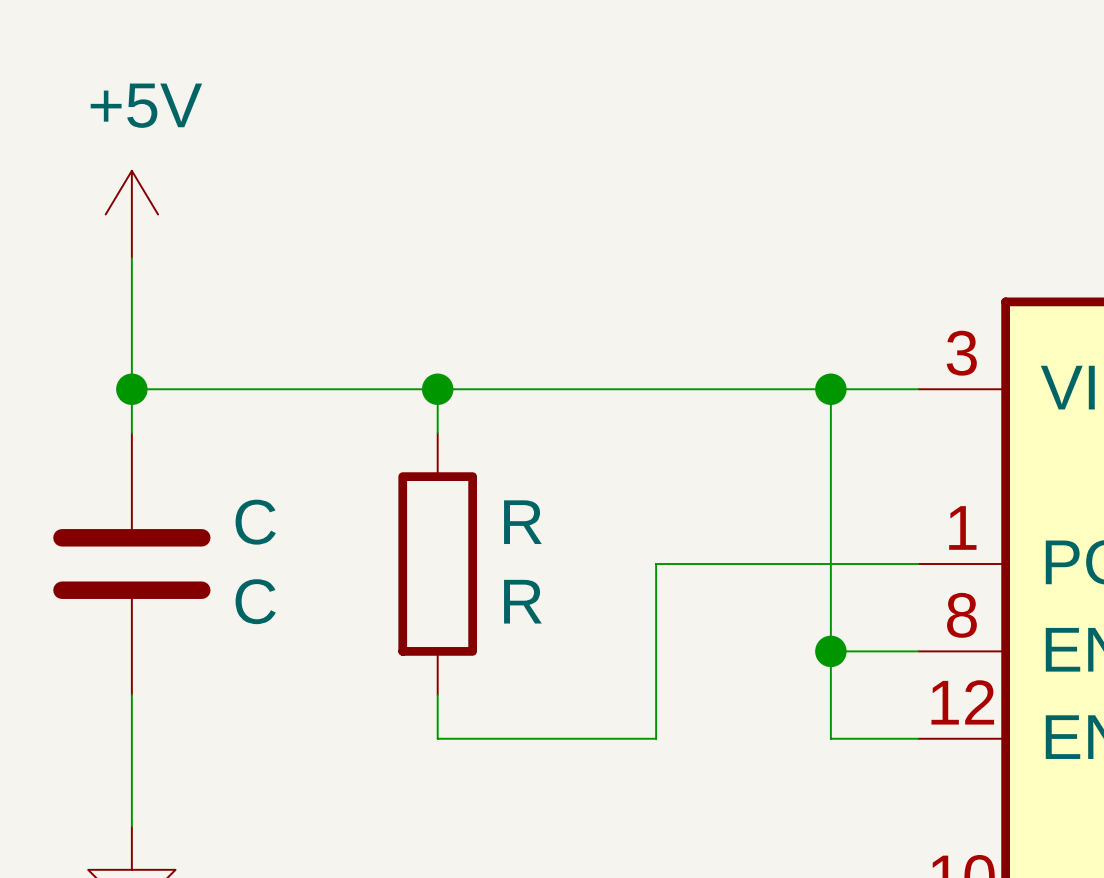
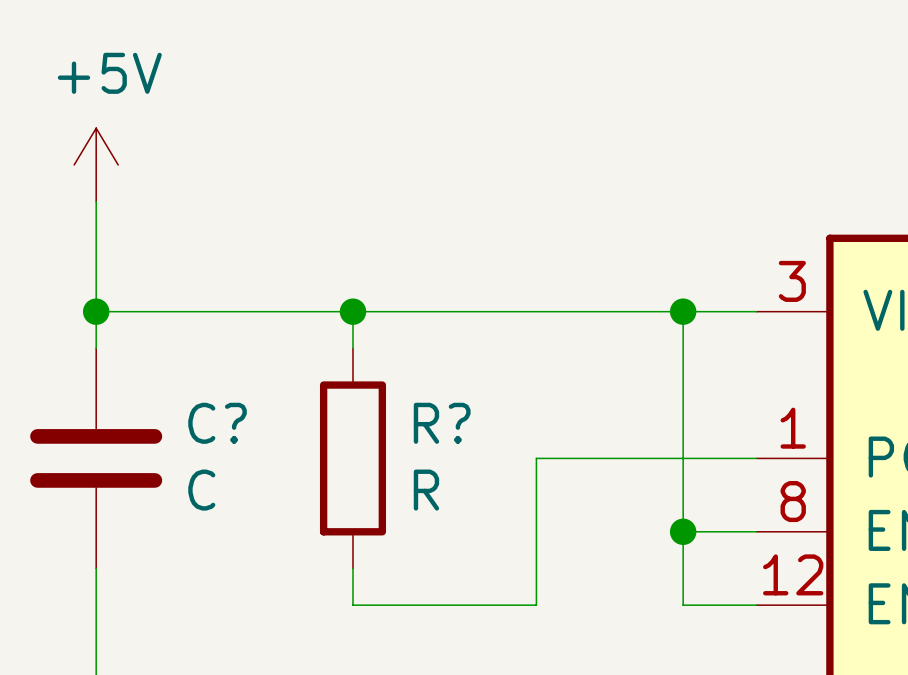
C name: C (255, 522) -> C? (217, 423)
R name: R (522, 522) -> R? (442, 423)

